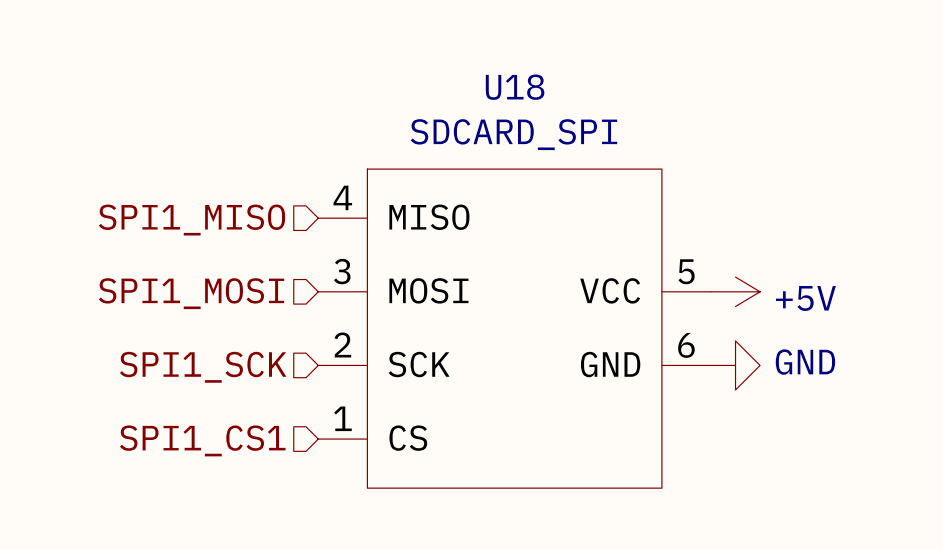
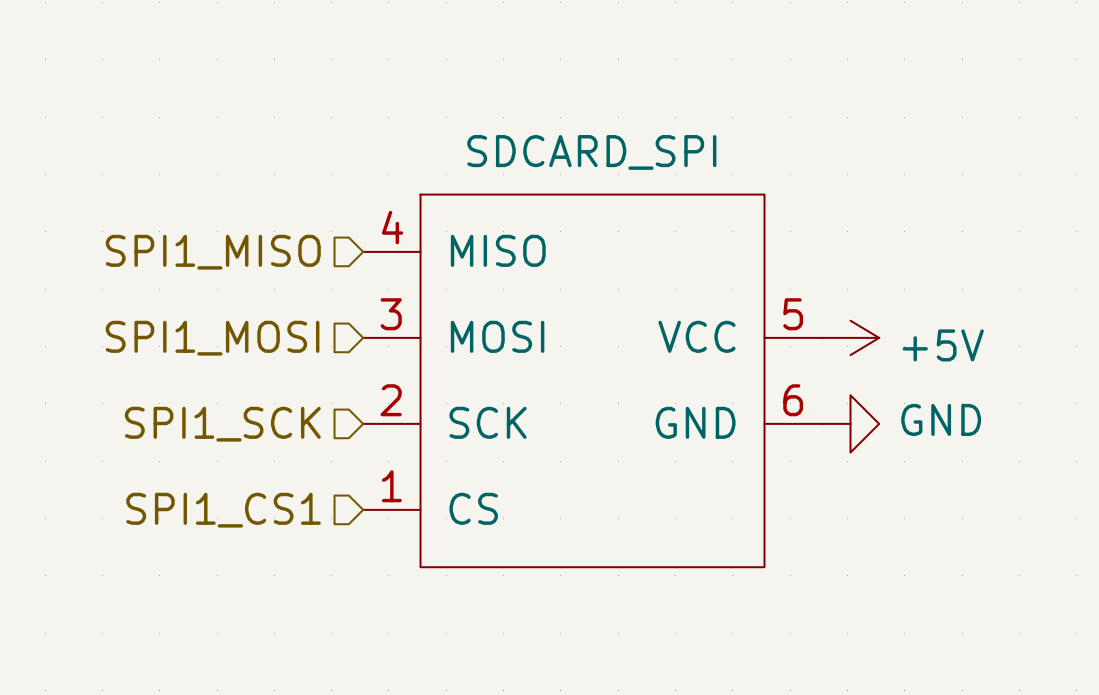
U18 name: U18 (515, 87) -> none

